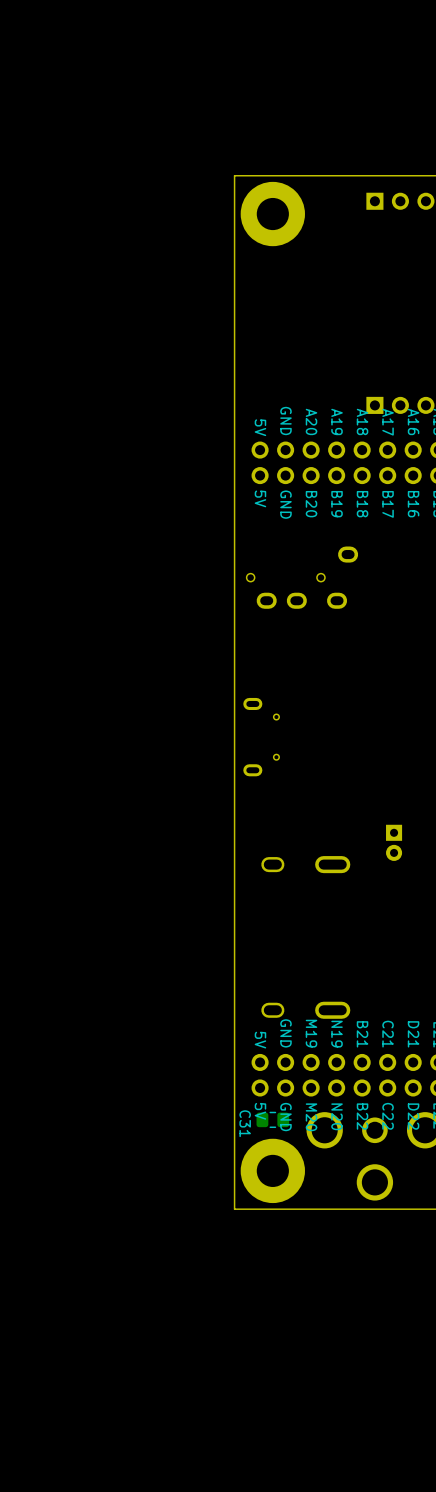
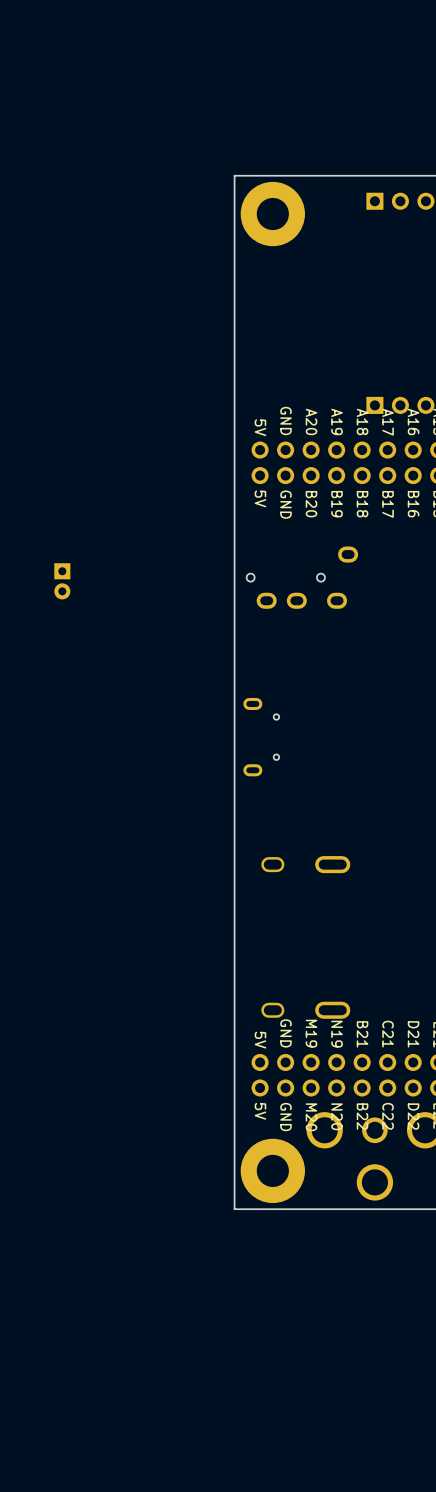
part: none -> (62, 581)
part: (394, 842) -> none
C31: (272, 1119) -> none

